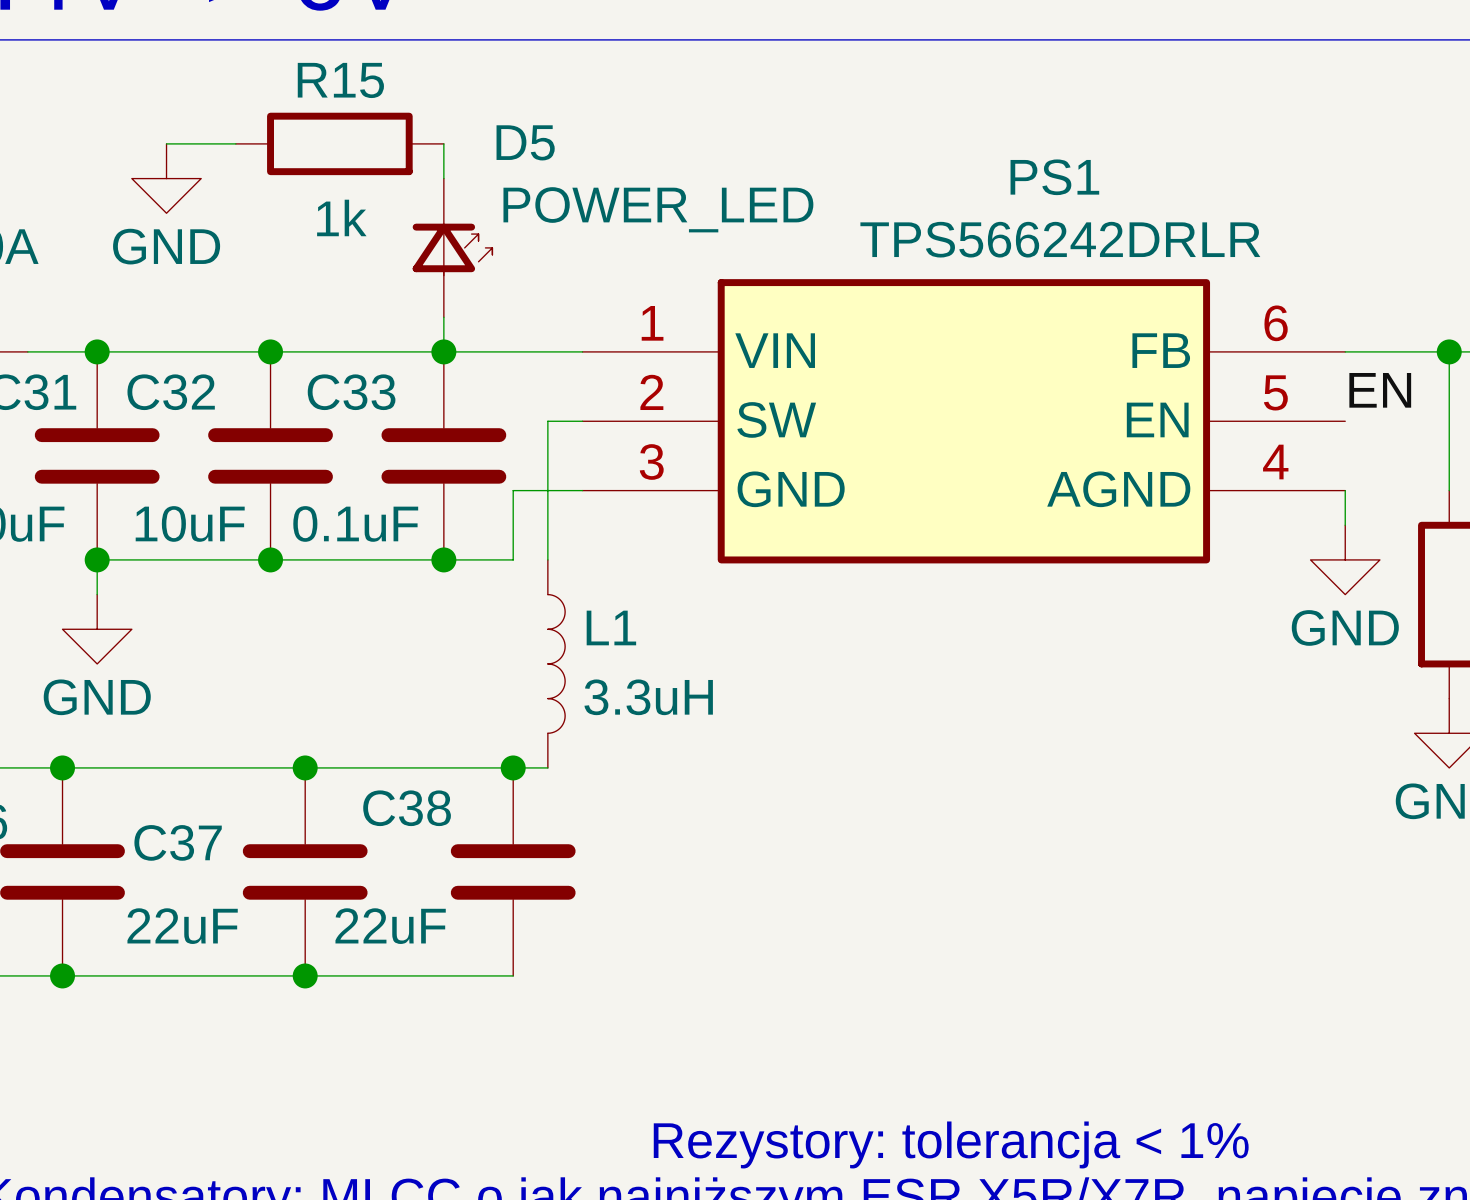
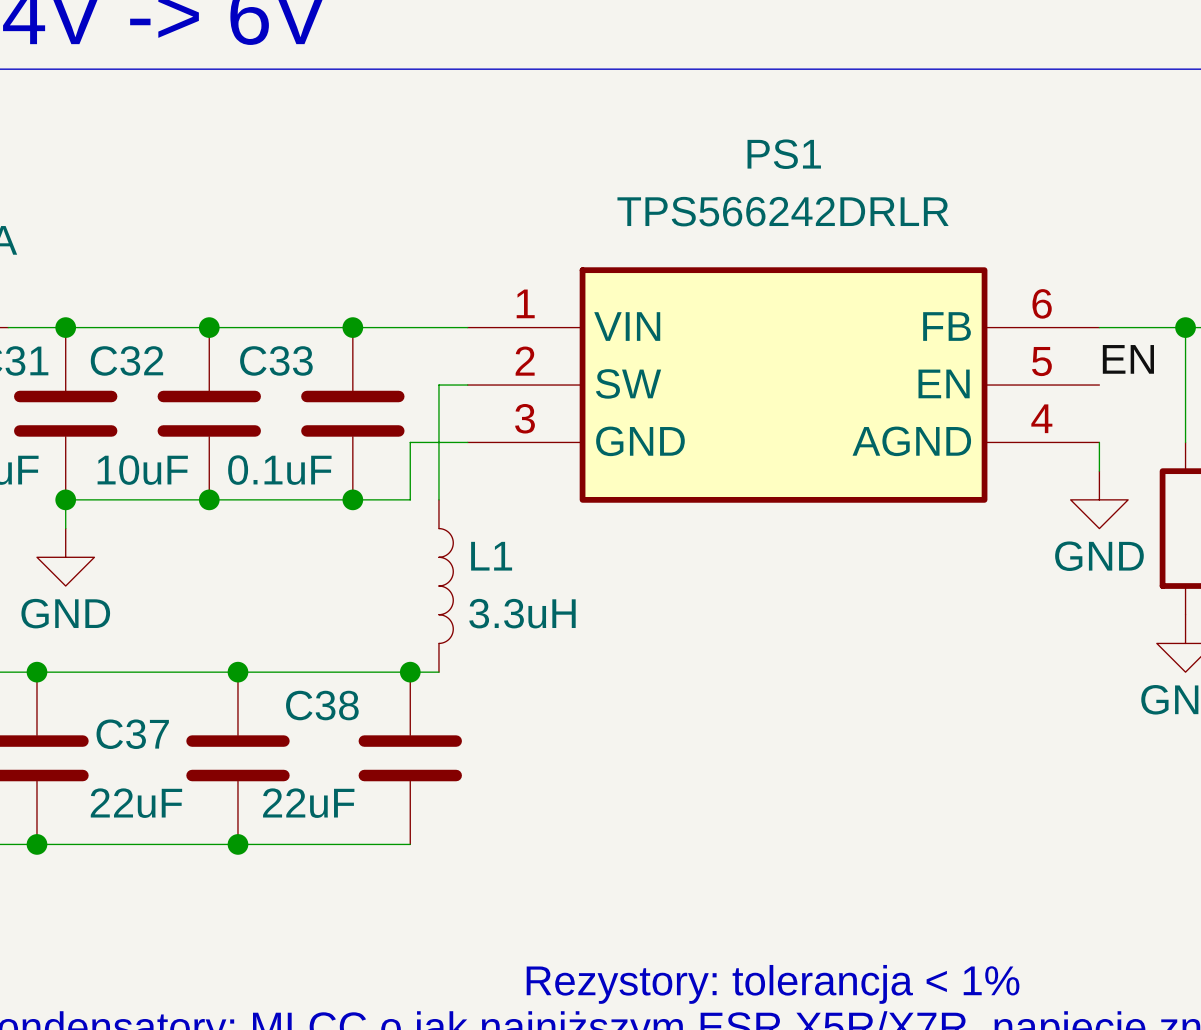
wire: (166, 143) (235, 143) -> none
R15: 1k (339, 143) -> none
wire: (443, 143) (443, 178) -> none
PS1 name position: PS1 (1054, 177) -> PS1 (784, 154)
power symbol: GND (166, 178) -> none
PS1 value position: TPS566242DRLR (1060, 239) -> TPS566242DRLR (783, 211)
D5: POWER_LED (452, 247) -> none
wire: (443, 317) (443, 351) -> none

